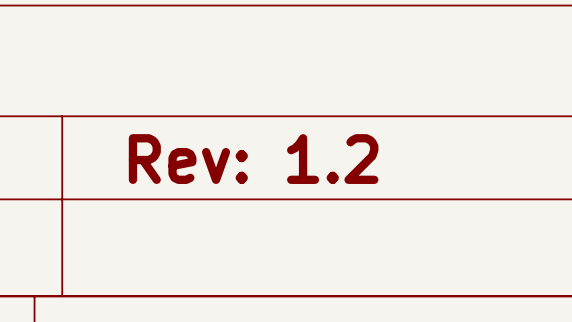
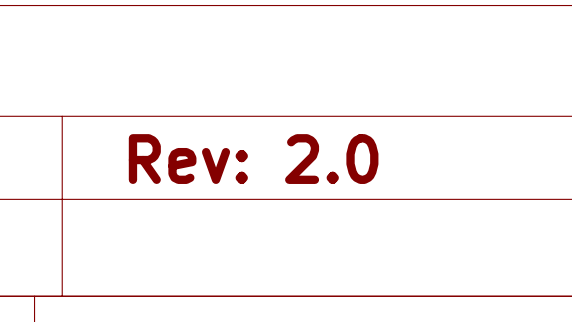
title block: Rev: 1.2 (253, 159) -> Rev: 2.0 (253, 159)

